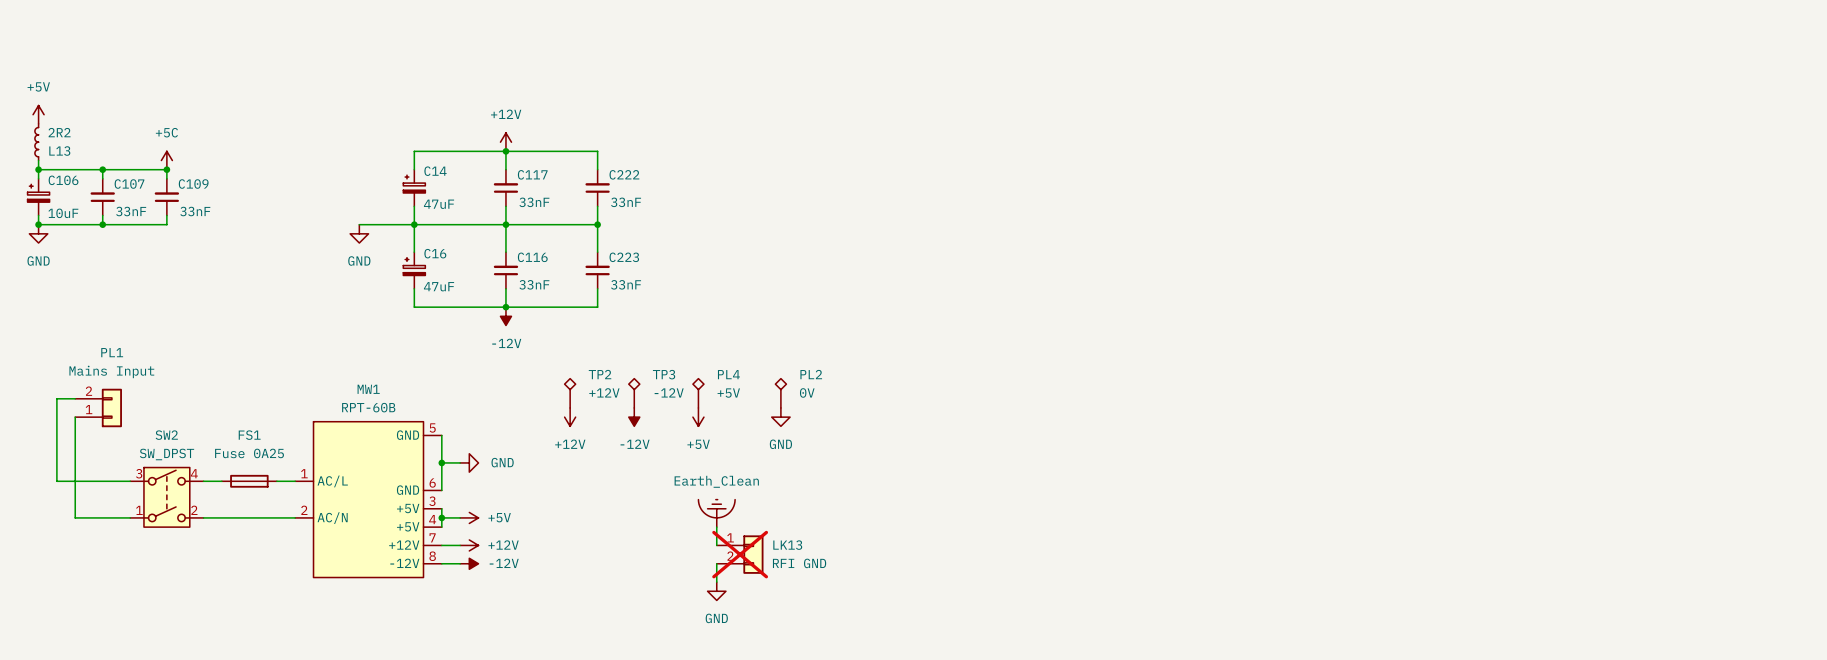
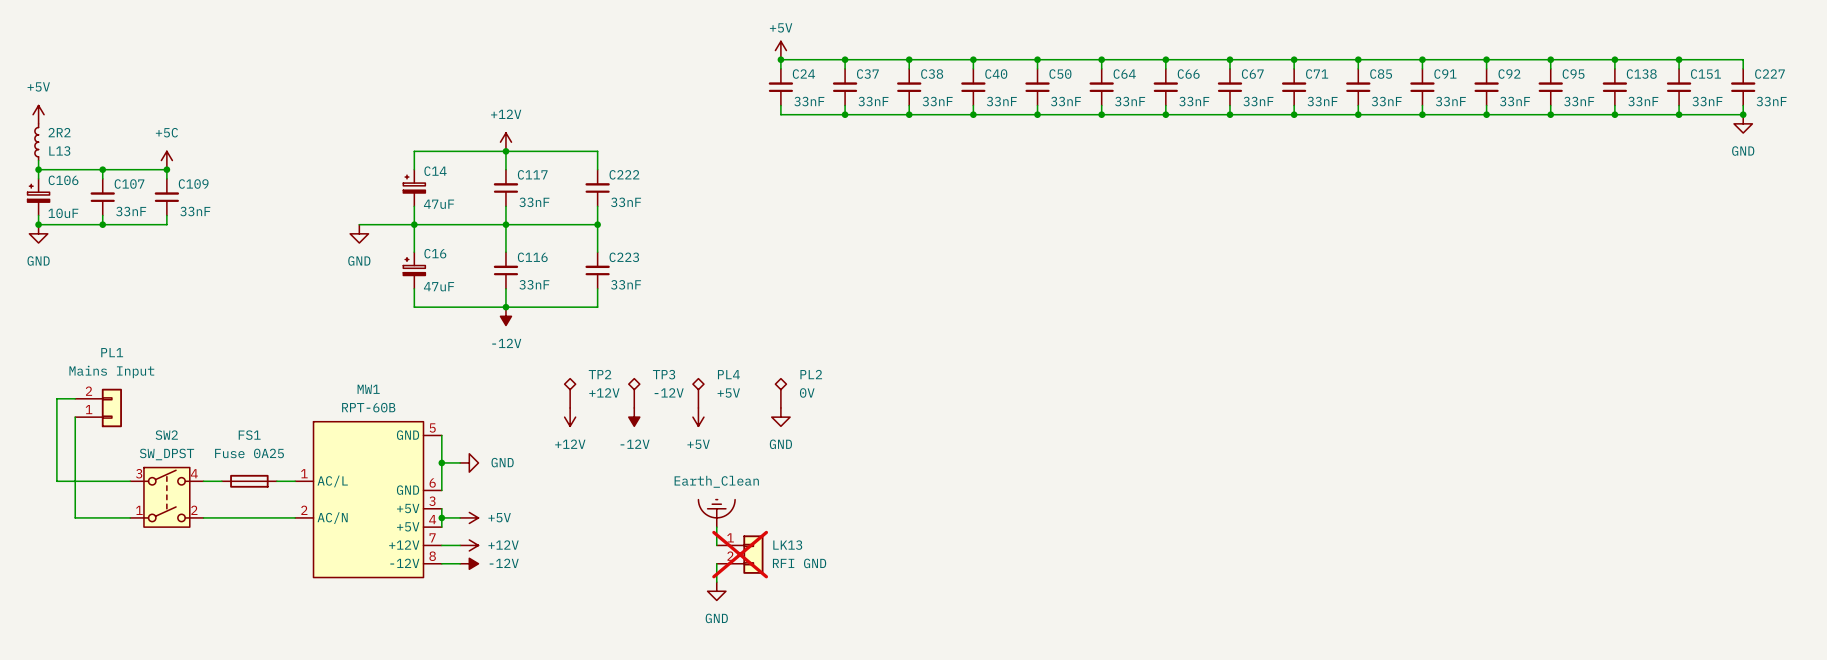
power symbol: none -> +5V (780, 50)
junction: none -> (780, 59)
wire: none -> (845, 59) (845, 68)
junction: none -> (845, 59)
wire: none -> (909, 59) (909, 68)
junction: none -> (909, 59)
wire: none -> (973, 59) (973, 68)
junction: none -> (973, 59)
wire: none -> (1037, 59) (1037, 68)
junction: none -> (1037, 59)
wire: none -> (1101, 59) (1101, 68)
junction: none -> (1101, 59)
wire: none -> (1165, 59) (1165, 68)
junction: none -> (1165, 59)
wire: none -> (1229, 59) (1229, 68)
junction: none -> (1229, 59)
wire: none -> (1294, 59) (1294, 68)
junction: none -> (1294, 59)
wire: none -> (1358, 59) (1358, 68)
junction: none -> (1358, 59)
wire: none -> (1422, 59) (1422, 68)
junction: none -> (1422, 59)
wire: none -> (1486, 59) (1486, 68)
junction: none -> (1486, 59)
wire: none -> (1550, 59) (1550, 68)
junction: none -> (1550, 59)
wire: none -> (1614, 59) (1614, 68)
junction: none -> (1614, 59)
wire: none -> (1679, 59) (1679, 68)
junction: none -> (1679, 59)
wire: none -> (780, 68) (780, 59) (1743, 59) (1743, 68)
C24: none -> 33nF (780, 87)
C37: none -> 33nF (845, 87)
C38: none -> 33nF (909, 87)
C40: none -> 33nF (973, 87)
C50: none -> 33nF (1037, 87)
C64: none -> 33nF (1101, 87)
C66: none -> 33nF (1165, 87)
C67: none -> 33nF (1229, 87)
C71: none -> 33nF (1294, 87)
C85: none -> 33nF (1358, 87)
C91: none -> 33nF (1422, 87)
C92: none -> 33nF (1486, 87)
C95: none -> 33nF (1550, 87)
C138: none -> 33nF (1614, 87)
C151: none -> 33nF (1679, 87)
C227: none -> 33nF (1743, 87)
wire: none -> (780, 105) (780, 114) (1743, 114) (1743, 105)
wire: none -> (845, 105) (845, 114)
wire: none -> (909, 105) (909, 114)
wire: none -> (973, 105) (973, 114)
wire: none -> (1037, 105) (1037, 114)
wire: none -> (1101, 105) (1101, 114)
wire: none -> (1165, 105) (1165, 114)
wire: none -> (1229, 105) (1229, 114)
wire: none -> (1294, 105) (1294, 114)
wire: none -> (1358, 105) (1358, 114)
wire: none -> (1422, 105) (1422, 114)
wire: none -> (1486, 105) (1486, 114)
wire: none -> (1550, 105) (1550, 114)
wire: none -> (1614, 105) (1614, 114)
wire: none -> (1679, 105) (1679, 114)
junction: none -> (845, 114)
junction: none -> (909, 114)
junction: none -> (973, 114)
junction: none -> (1037, 114)
junction: none -> (1101, 114)
junction: none -> (1165, 114)
junction: none -> (1229, 114)
junction: none -> (1294, 114)
junction: none -> (1358, 114)
junction: none -> (1422, 114)
junction: none -> (1486, 114)
junction: none -> (1550, 114)
junction: none -> (1614, 114)
junction: none -> (1679, 114)
junction: none -> (1743, 114)
power symbol: none -> GND (1743, 123)

